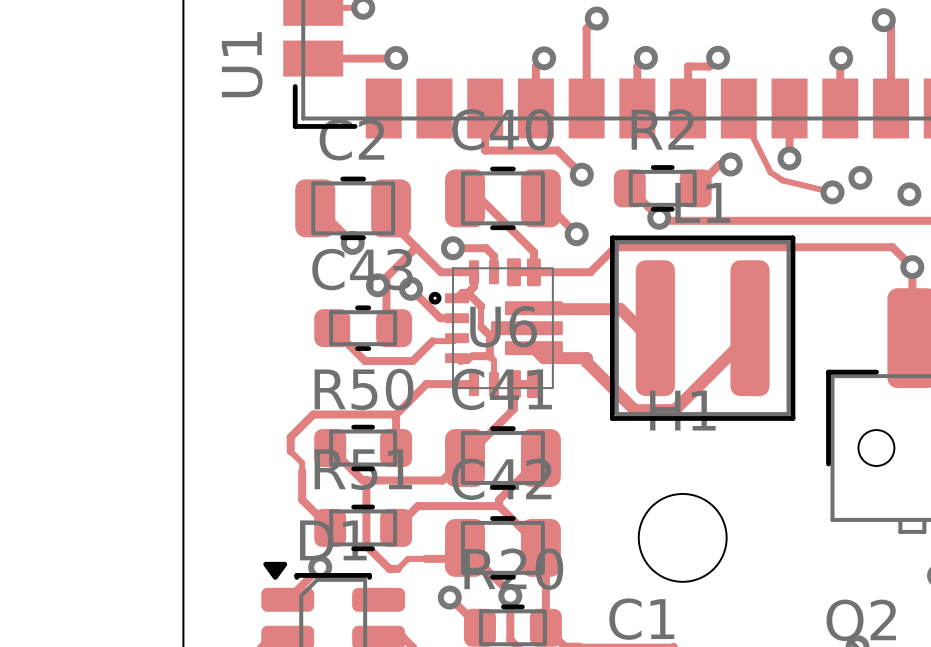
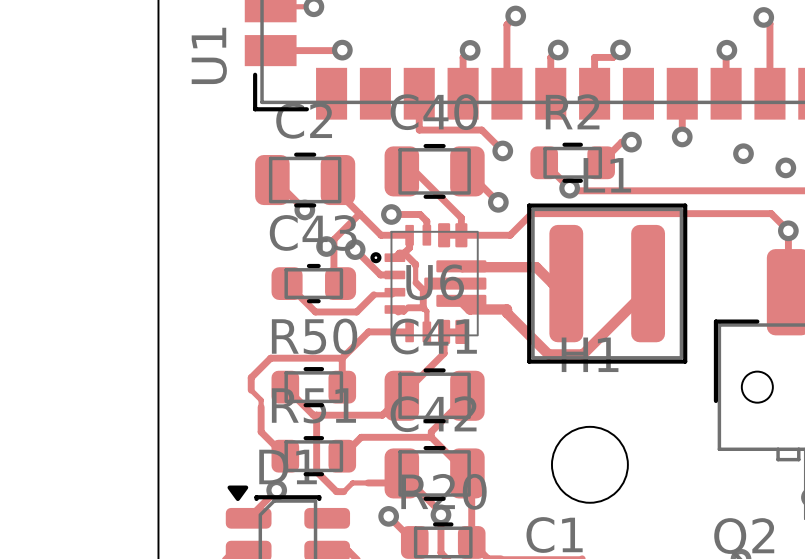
track: (738, 108) (770, 172) (782, 180) (832, 192) -> none
via: (832, 192) -> none

